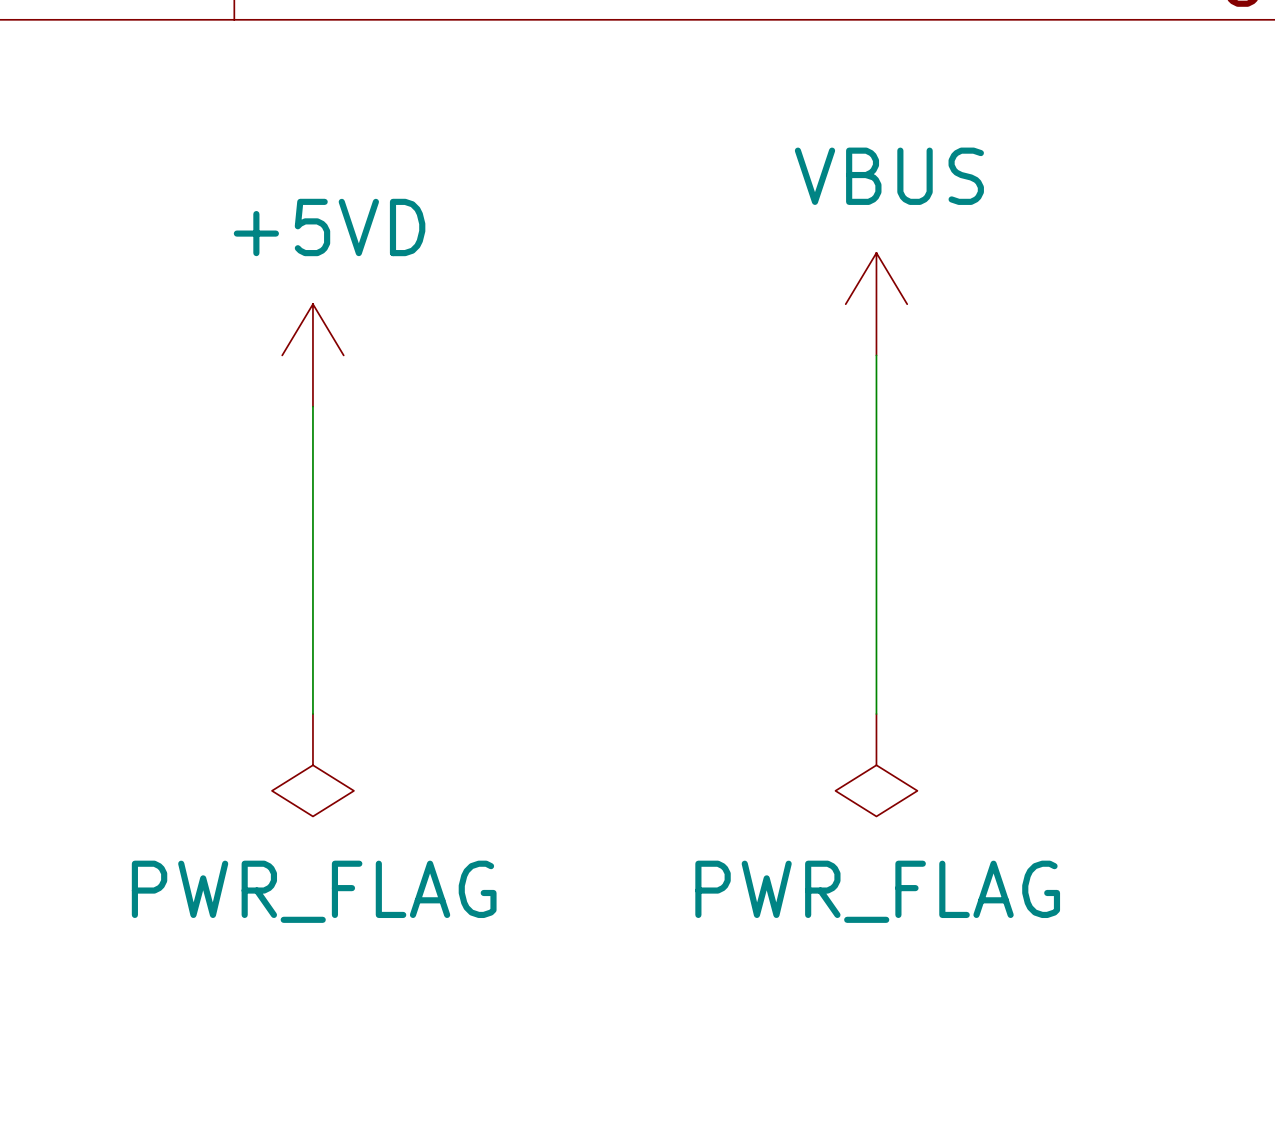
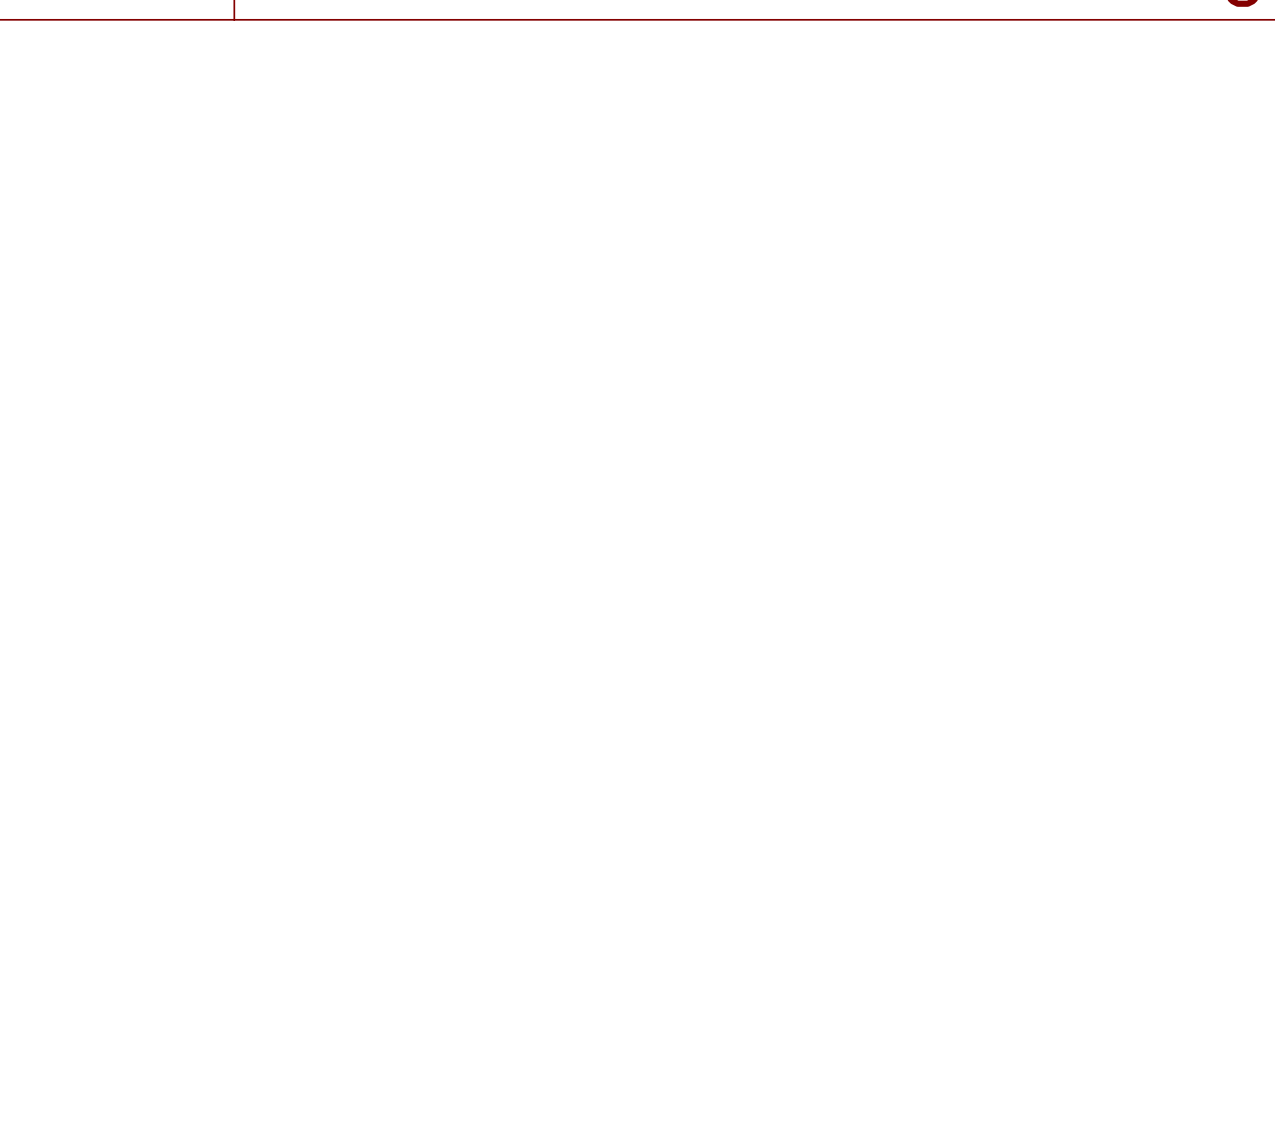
power symbol: VBUS (876, 304) -> none
power symbol: +5VD (312, 355) -> none
wire: (876, 355) (876, 714) -> none
wire: (312, 406) (312, 714) -> none
power symbol: PWR_FLAG (312, 765) -> none
power symbol: PWR_FLAG (876, 765) -> none

